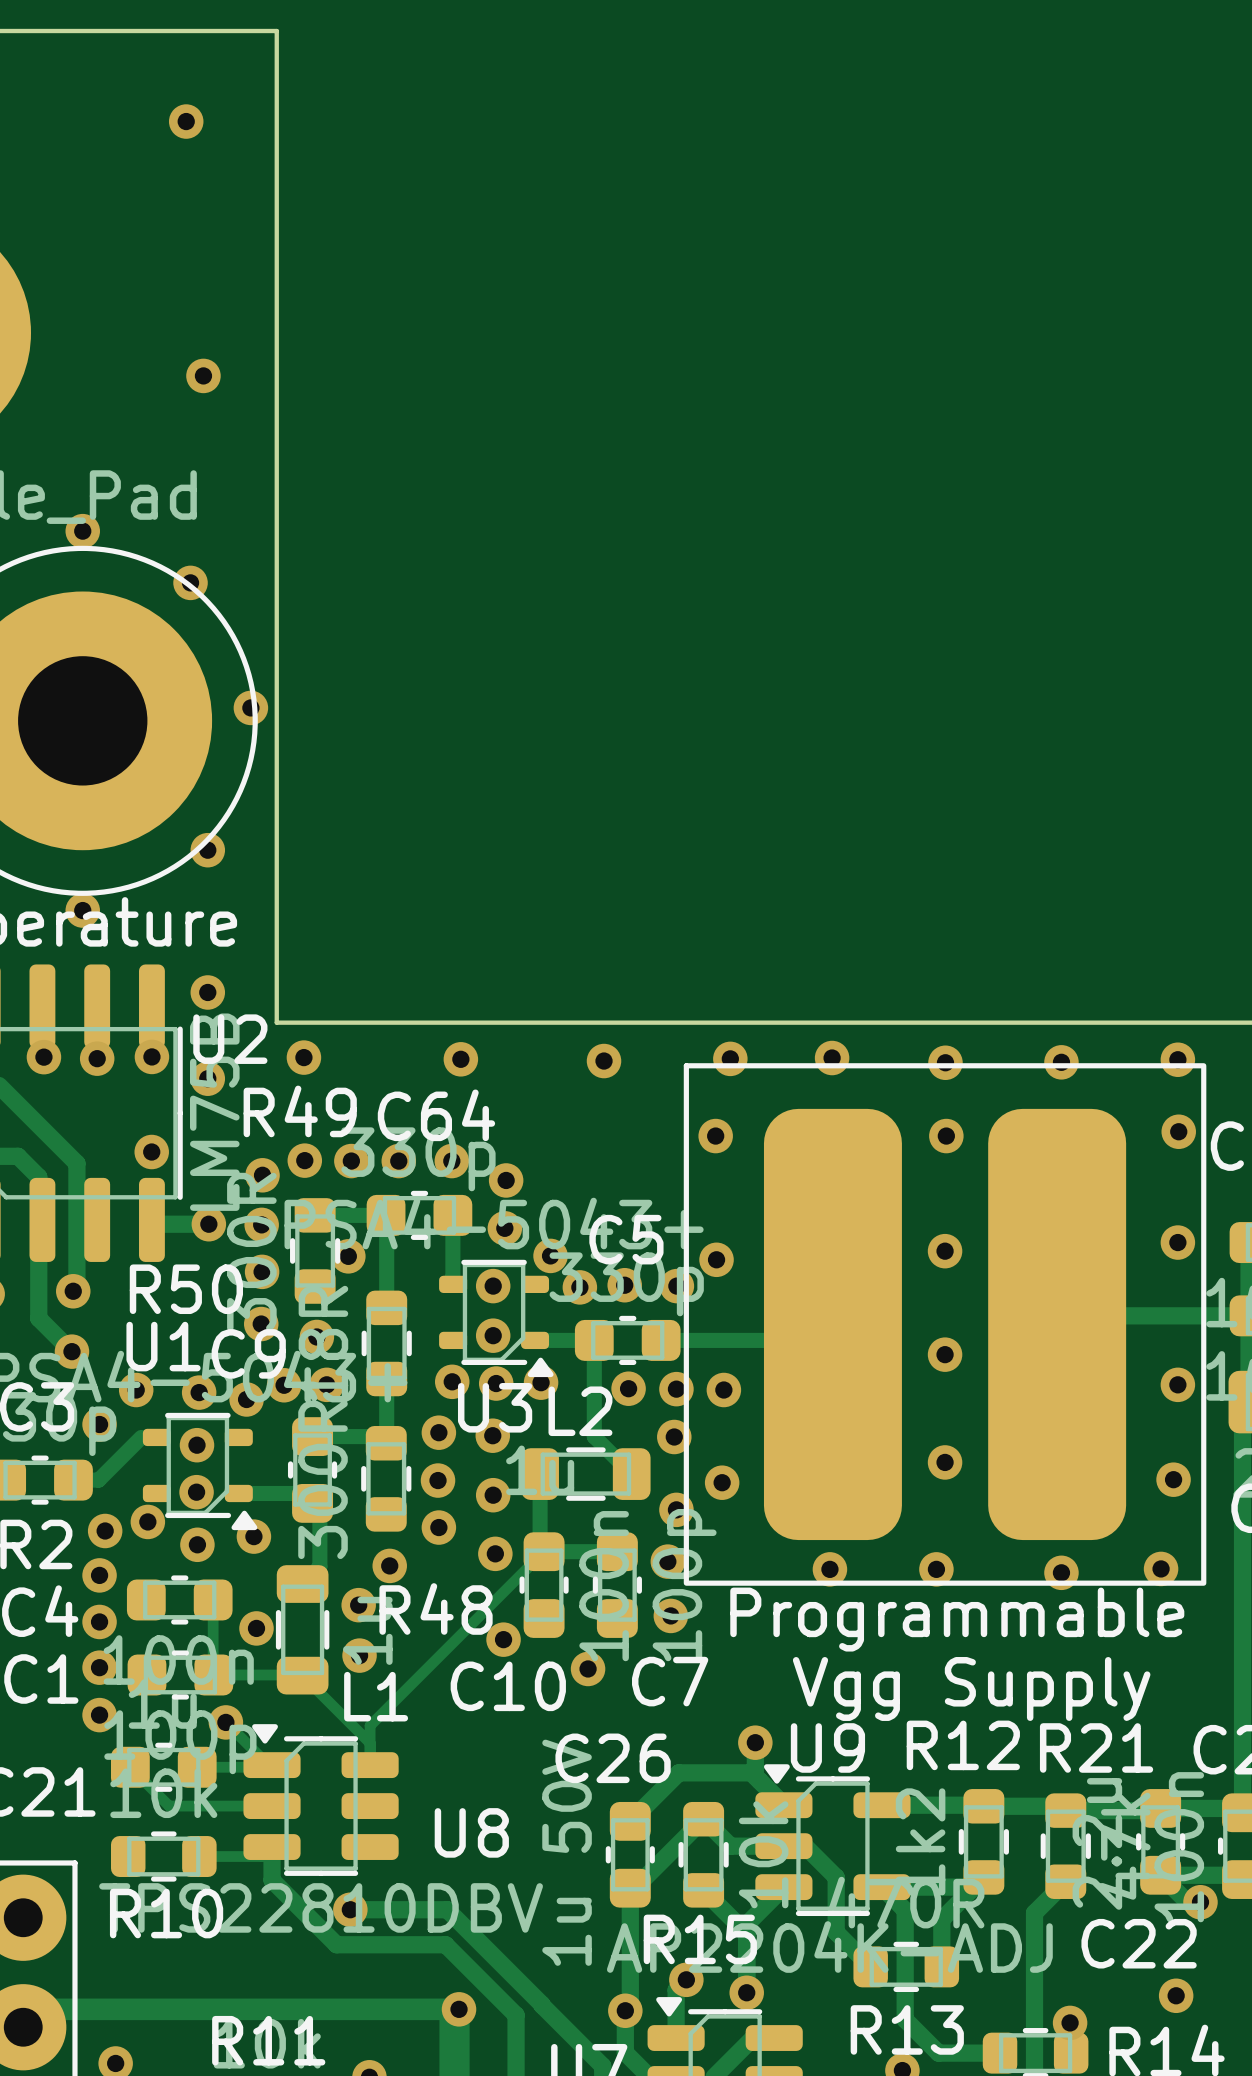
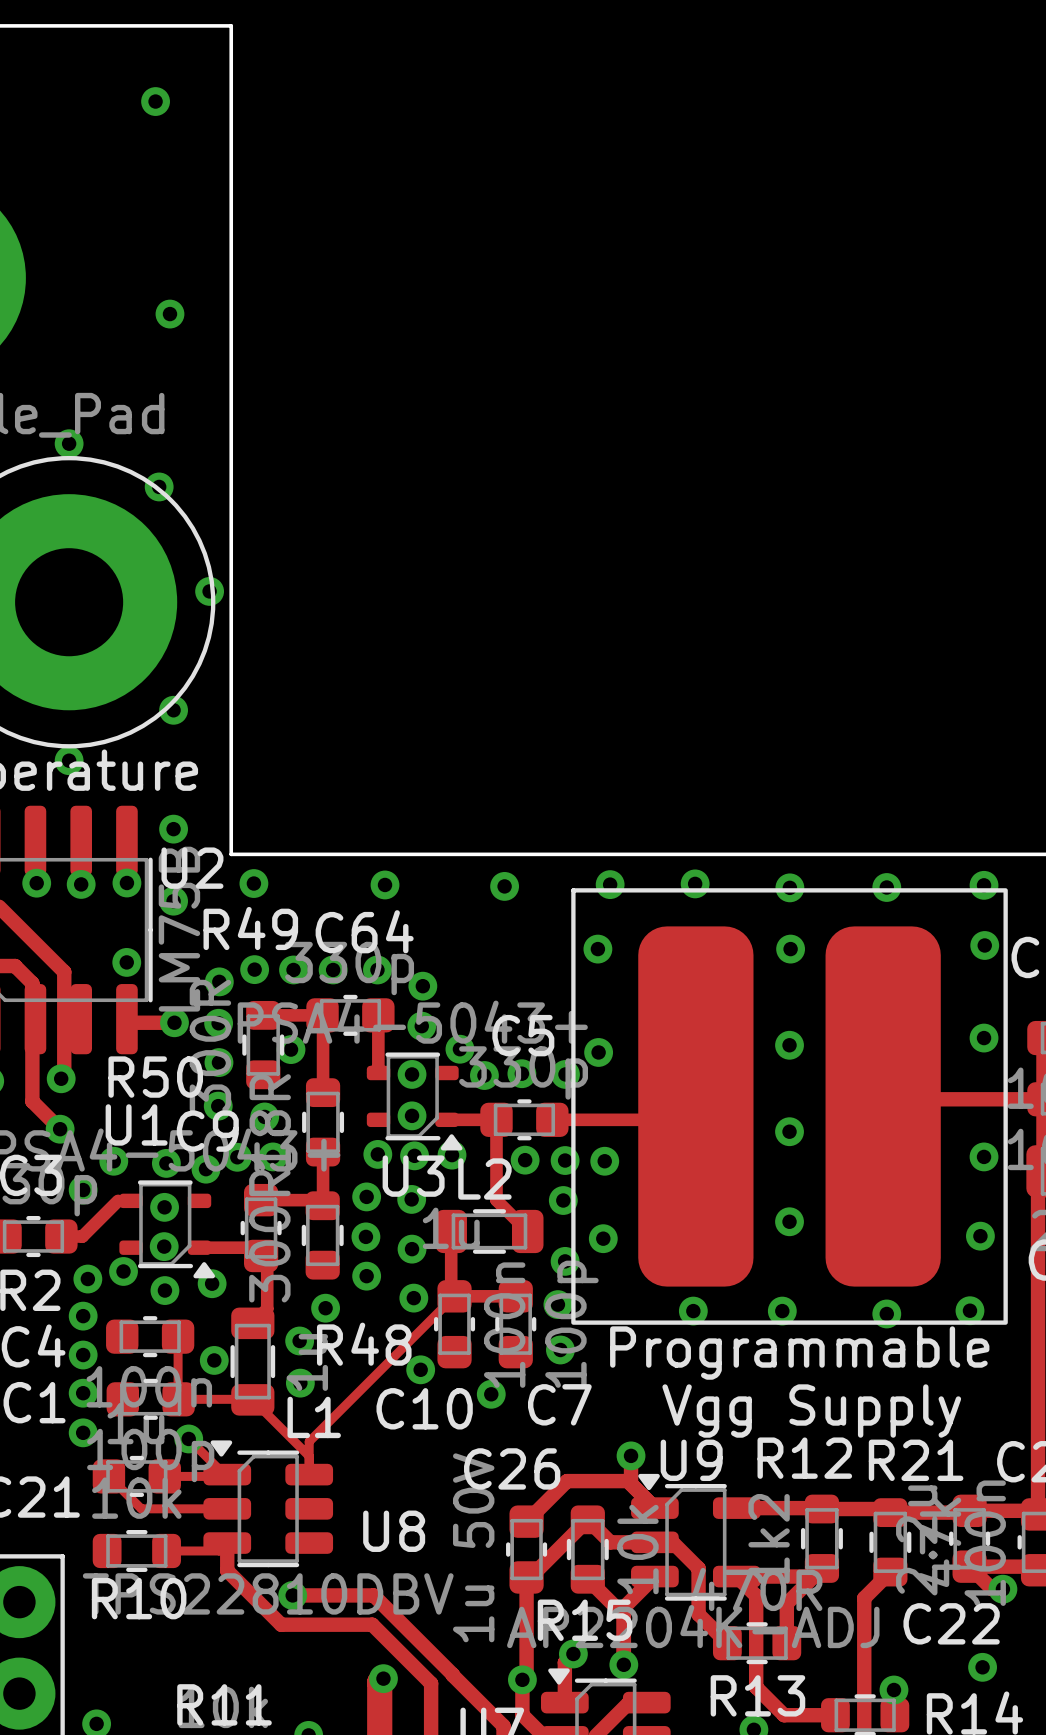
track: (41, 2009) (459, 2009) -> none

